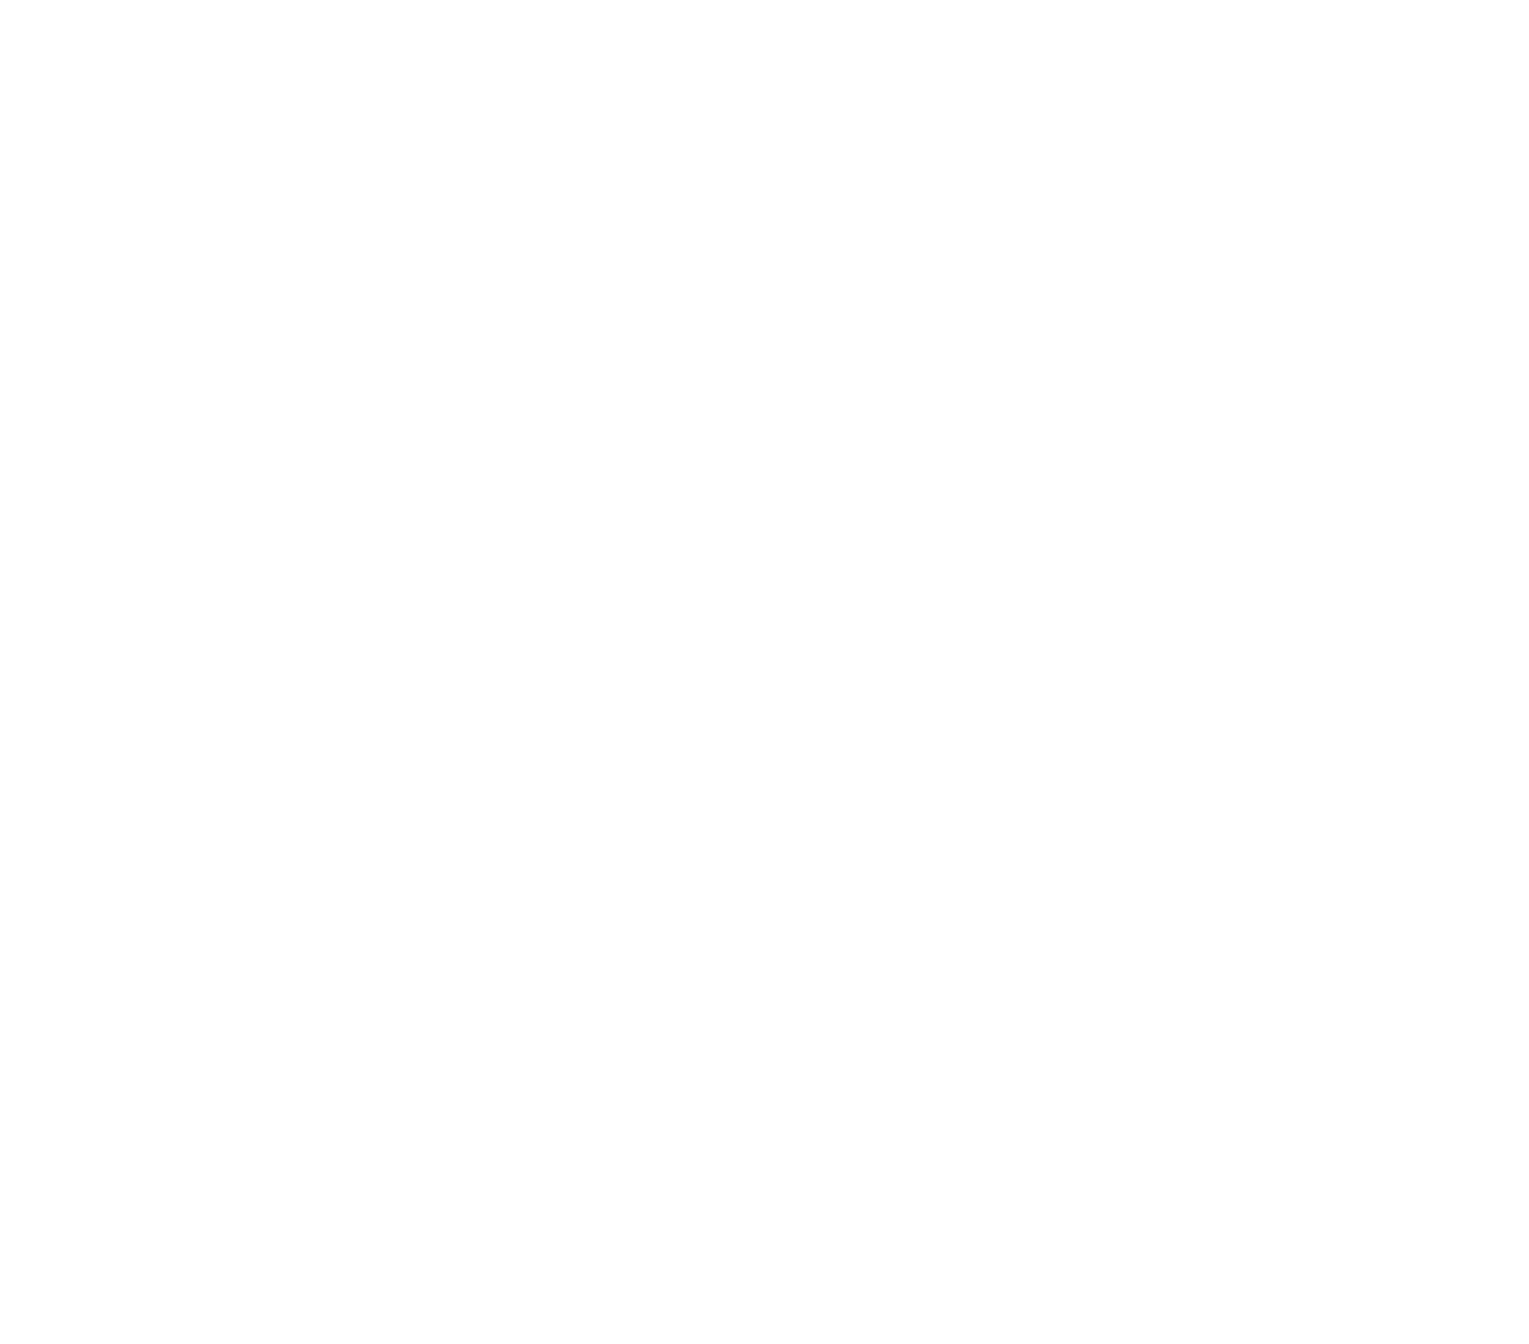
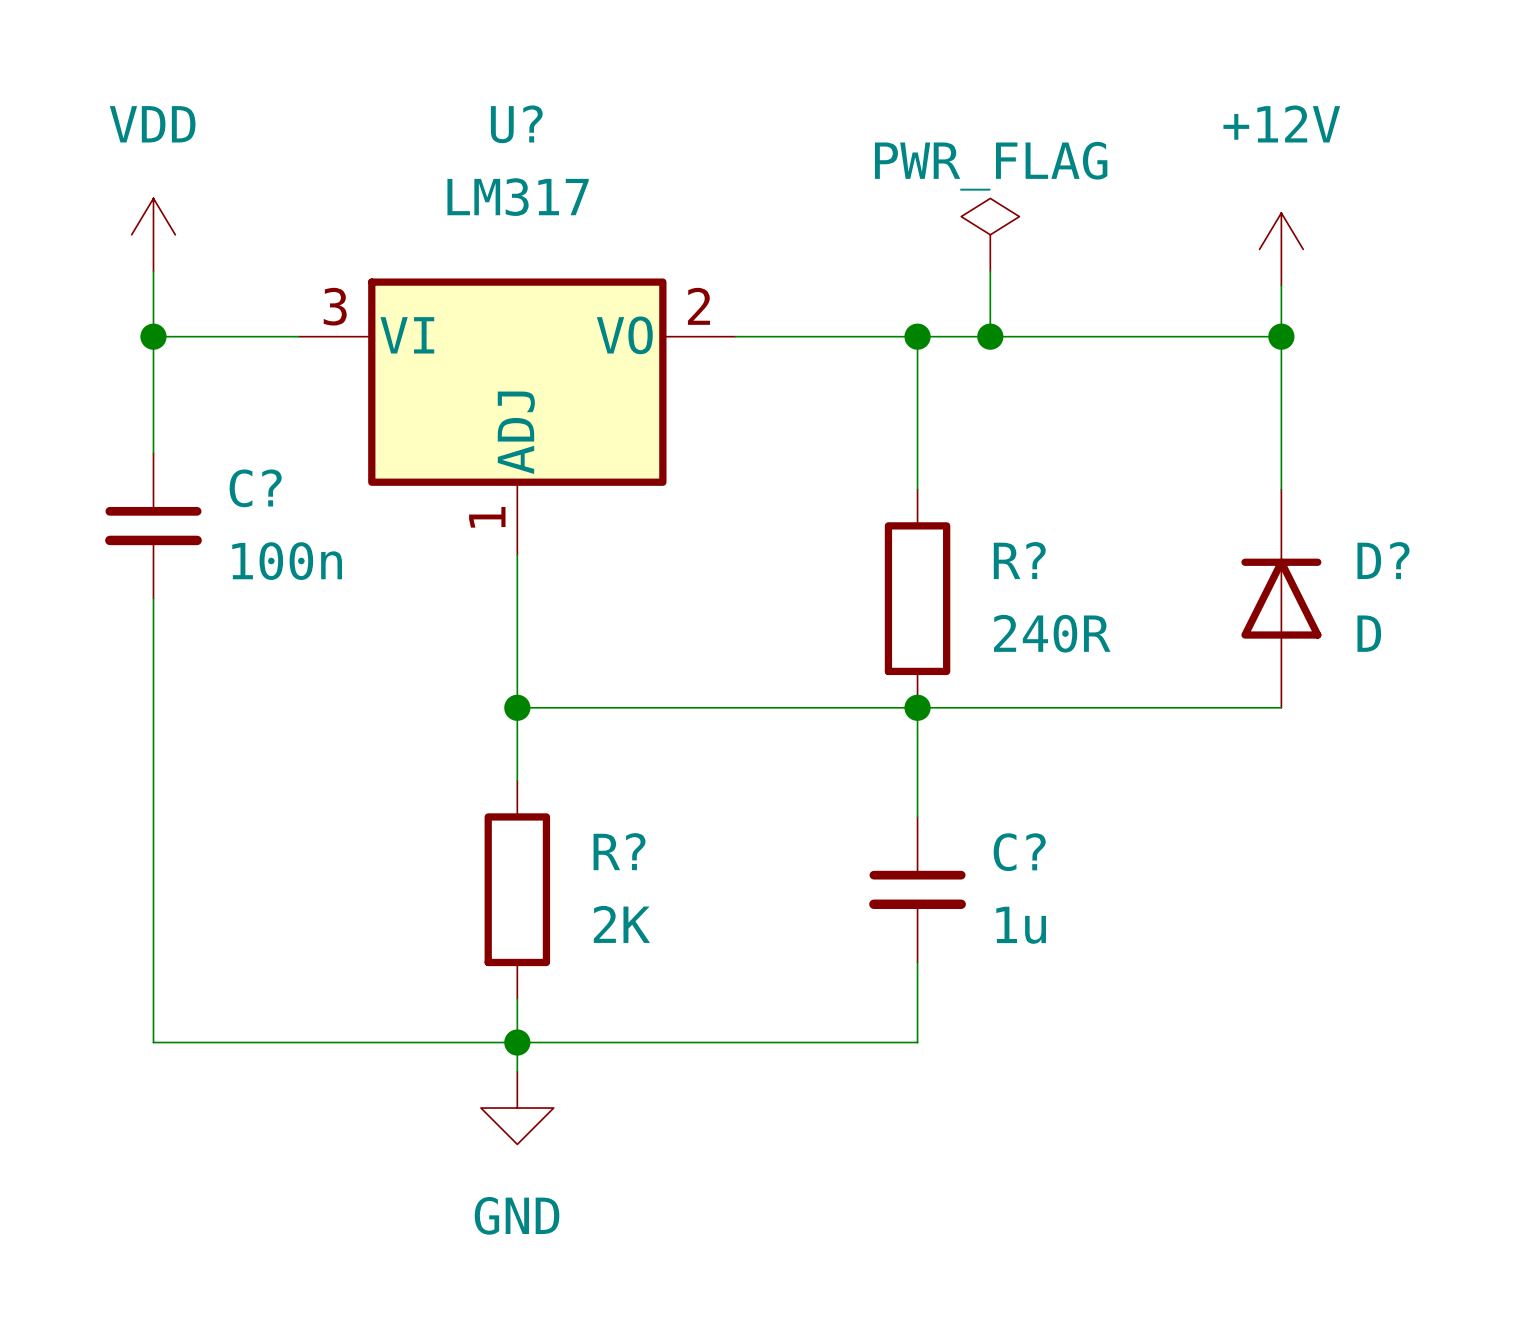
power symbol: none -> VDD (153, 234)
power symbol: none -> PWR_FLAG (990, 234)
power symbol: none -> +12V (1281, 249)
wire: none -> (153, 271) (153, 453)
wire: none -> (990, 271) (990, 336)
wire: none -> (1281, 285) (1281, 489)
wire: none -> (153, 336) (299, 336)
junction: none -> (153, 336)
wire: none -> (735, 336) (1281, 336)
wire: none -> (917, 336) (917, 489)
junction: none -> (917, 336)
junction: none -> (990, 336)
junction: none -> (1281, 336)
U?: none -> LM317 (517, 416)
C?: none -> 100n (153, 525)
wire: none -> (517, 554) (517, 780)
wire: none -> (153, 598) (153, 1042) (917, 1042) (917, 962)
R?: none -> 240R (917, 598)
D?: none -> D (1281, 598)
wire: none -> (517, 707) (1281, 707)
junction: none -> (517, 707)
wire: none -> (917, 707) (917, 816)
junction: none -> (917, 707)
R?: none -> 2K (517, 889)
C?: none -> 1u (917, 889)
wire: none -> (517, 998) (517, 1071)
junction: none -> (517, 1042)
power symbol: none -> GND (517, 1108)

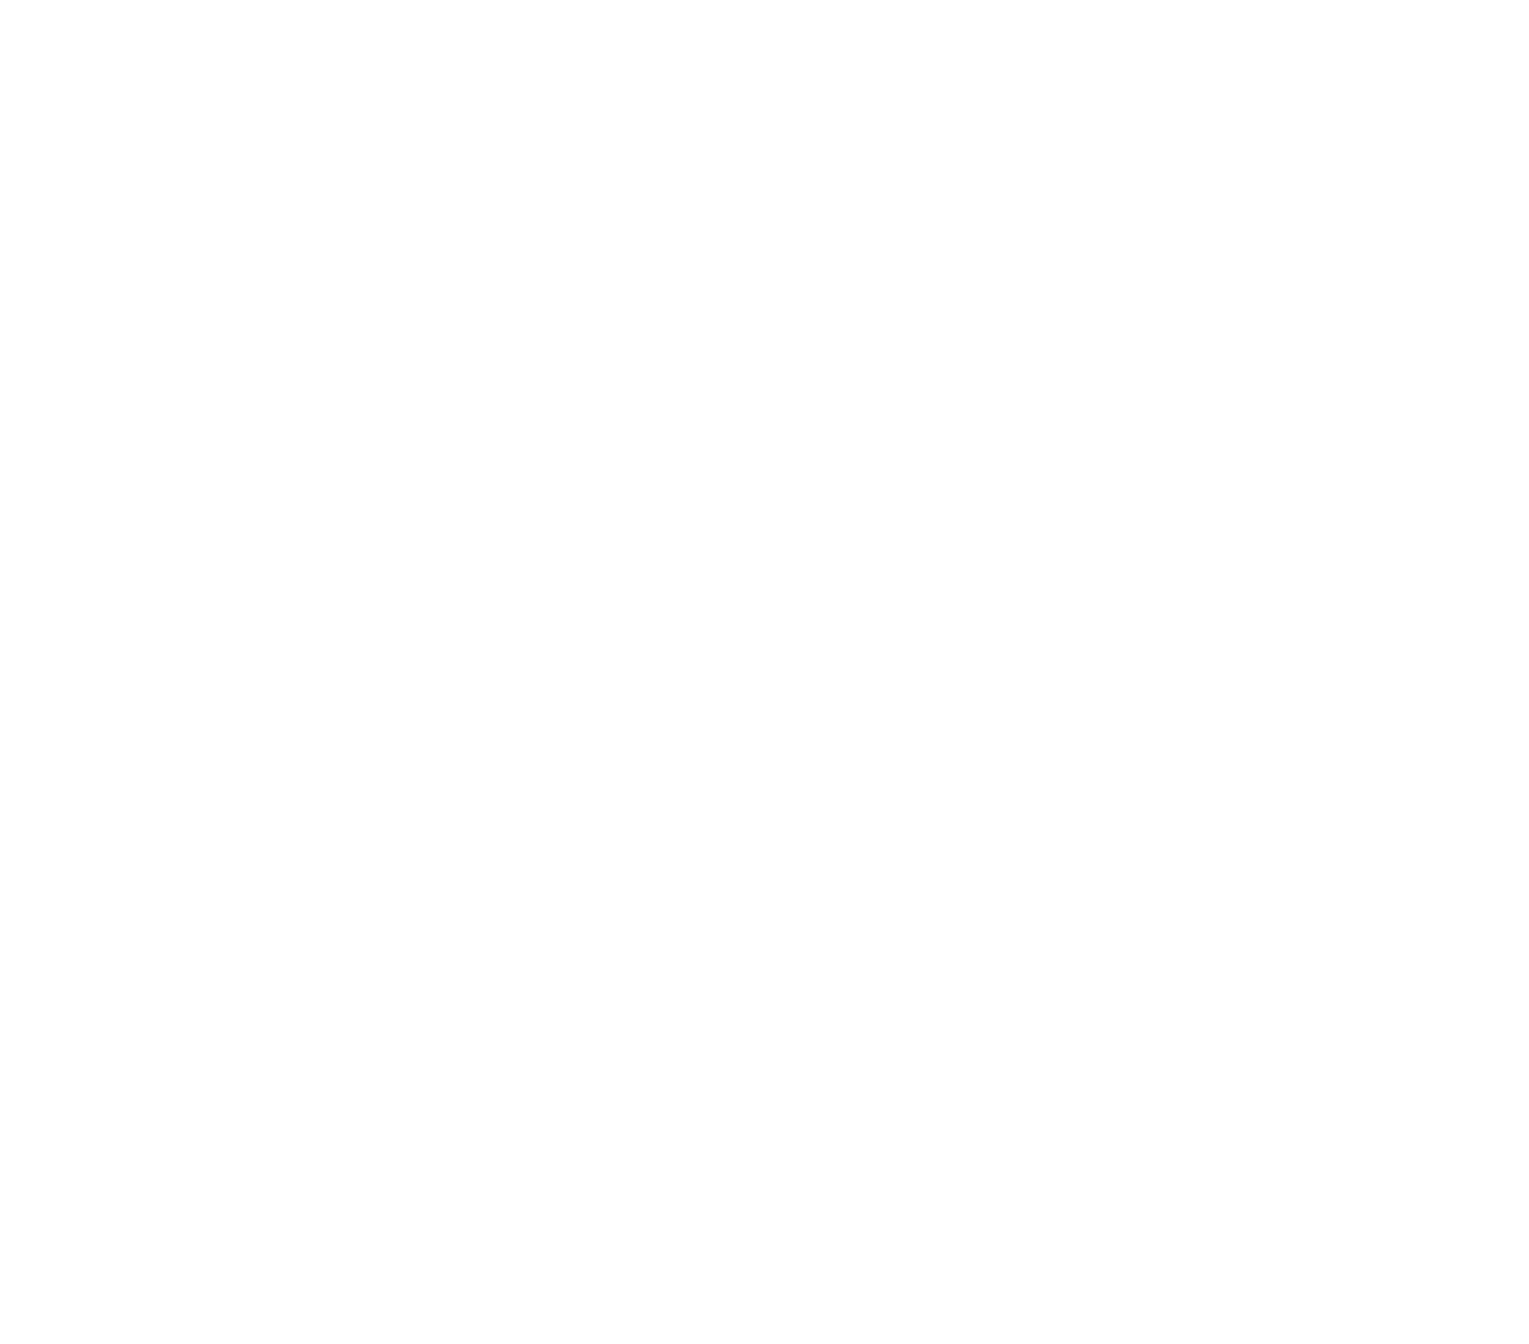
power symbol: VDD (153, 234) -> none
power symbol: PWR_FLAG (990, 234) -> none
power symbol: +12V (1281, 249) -> none
wire: (153, 271) (153, 453) -> none
wire: (990, 271) (990, 336) -> none
wire: (1281, 285) (1281, 489) -> none
wire: (153, 336) (299, 336) -> none
junction: (153, 336) -> none
wire: (735, 336) (1281, 336) -> none
wire: (917, 336) (917, 489) -> none
junction: (917, 336) -> none
junction: (990, 336) -> none
junction: (1281, 336) -> none
U?: LM317 (517, 416) -> none
C?: 100n (153, 525) -> none
wire: (517, 554) (517, 780) -> none
wire: (153, 598) (153, 1042) (917, 1042) (917, 962) -> none
R?: 240R (917, 598) -> none
D?: D (1281, 598) -> none
wire: (517, 707) (1281, 707) -> none
junction: (517, 707) -> none
wire: (917, 707) (917, 816) -> none
junction: (917, 707) -> none
R?: 2K (517, 889) -> none
C?: 1u (917, 889) -> none
wire: (517, 998) (517, 1071) -> none
junction: (517, 1042) -> none
power symbol: GND (517, 1108) -> none

